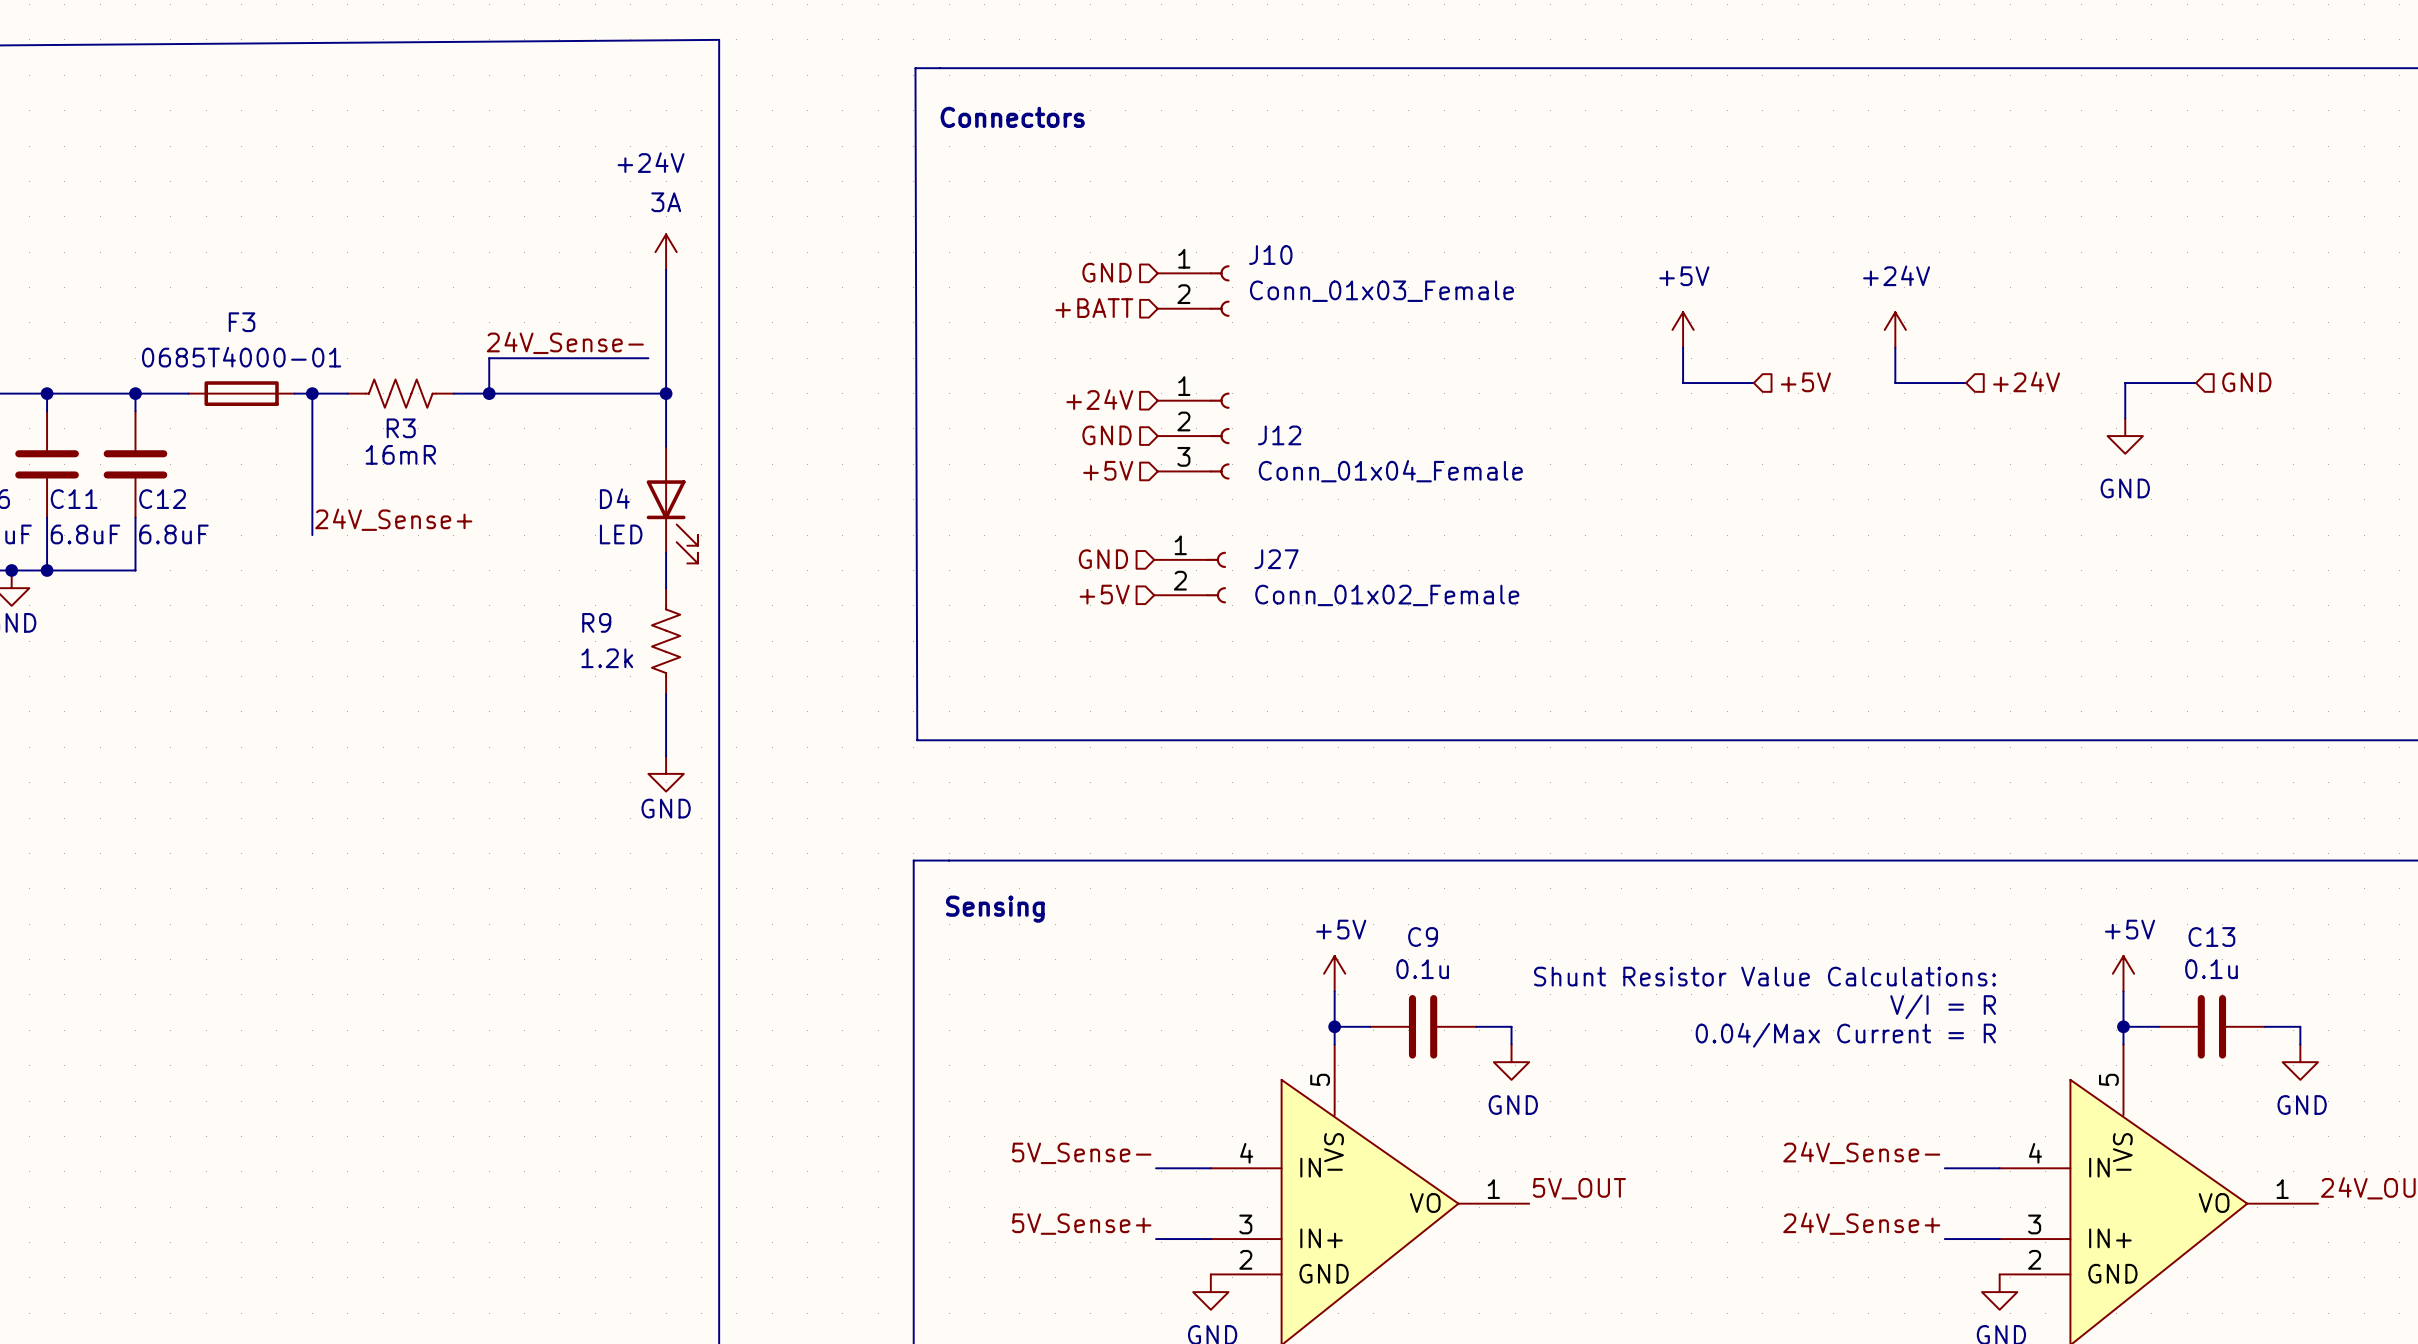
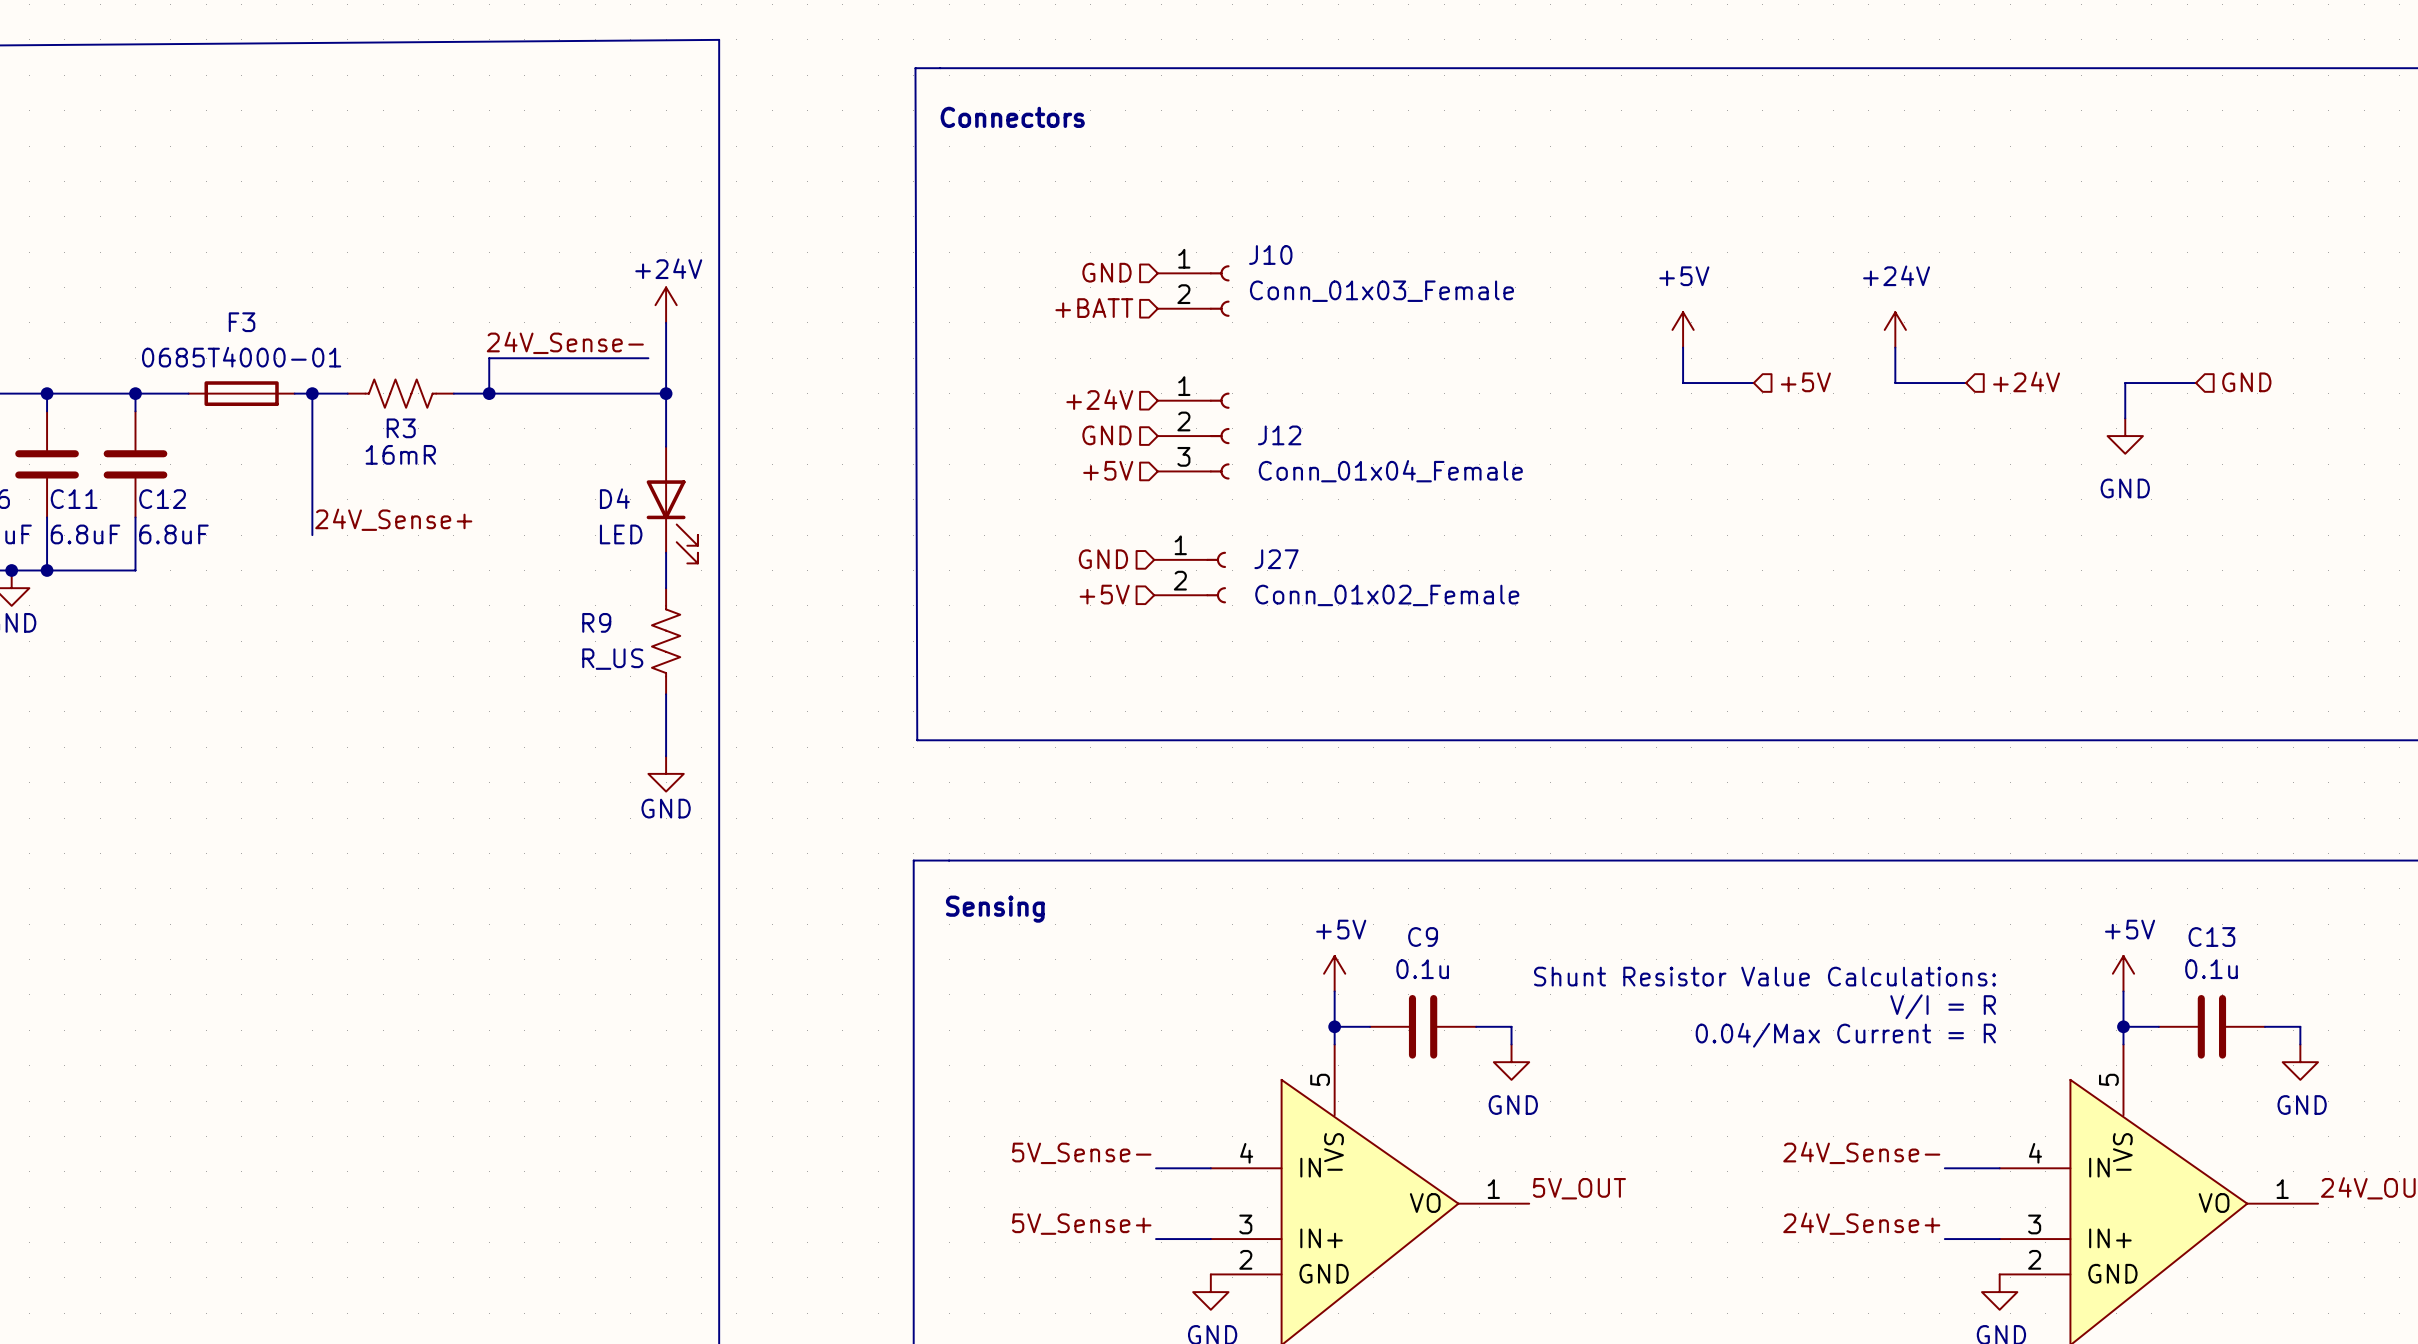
power symbol text position: +24V (651, 162) -> +24V (668, 268)
text: 3A (666, 202) -> none
power symbol position: +24V (666, 252) -> +24V (666, 305)
R9 value: 1.2k (607, 658) -> R_US (612, 659)

